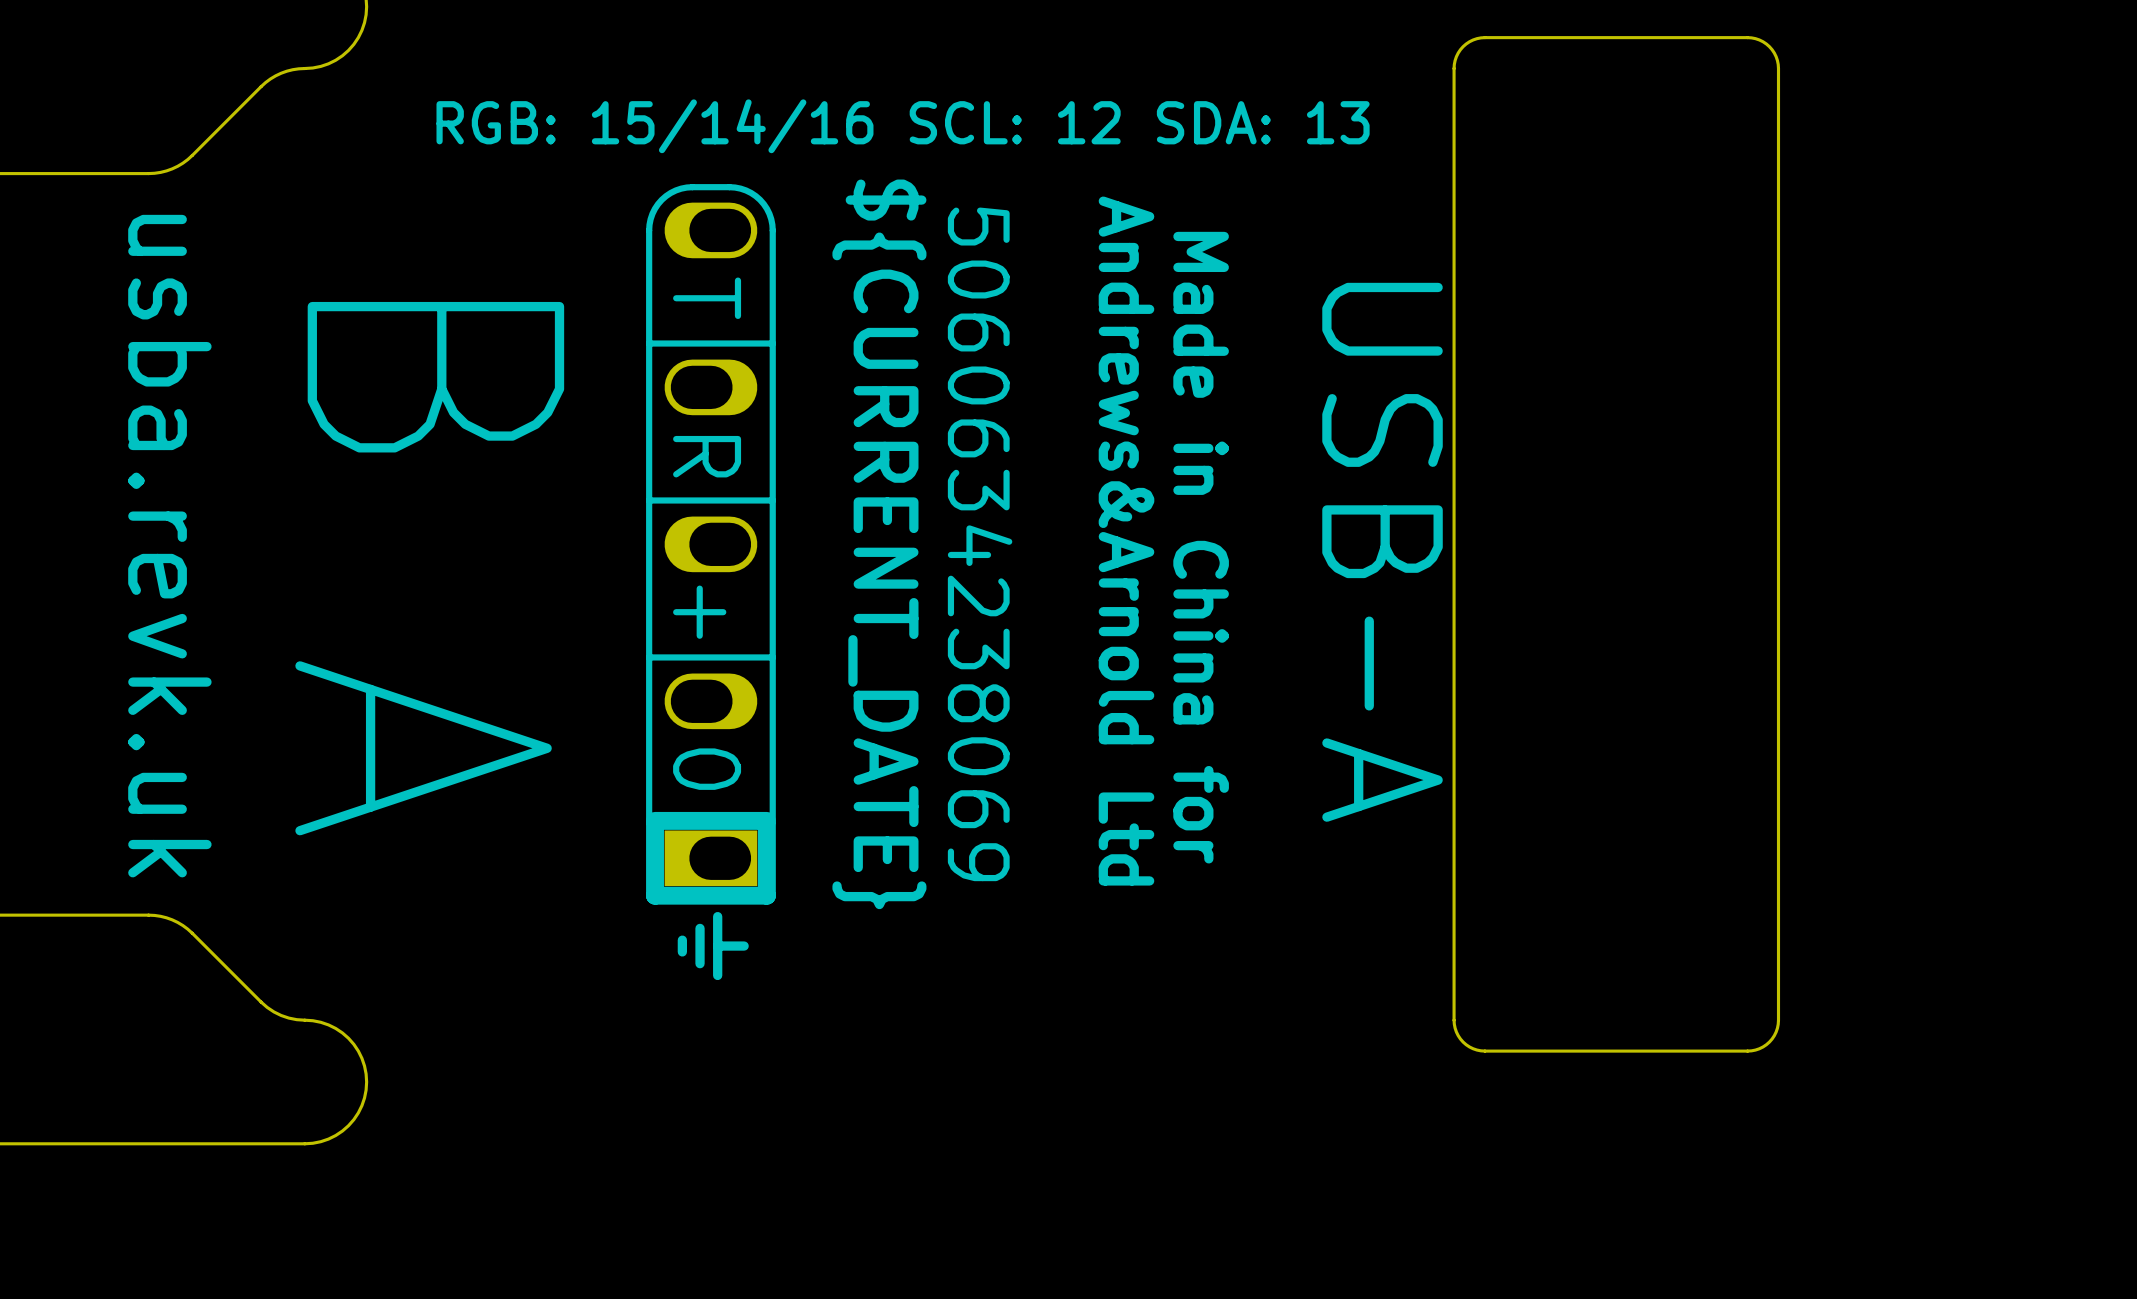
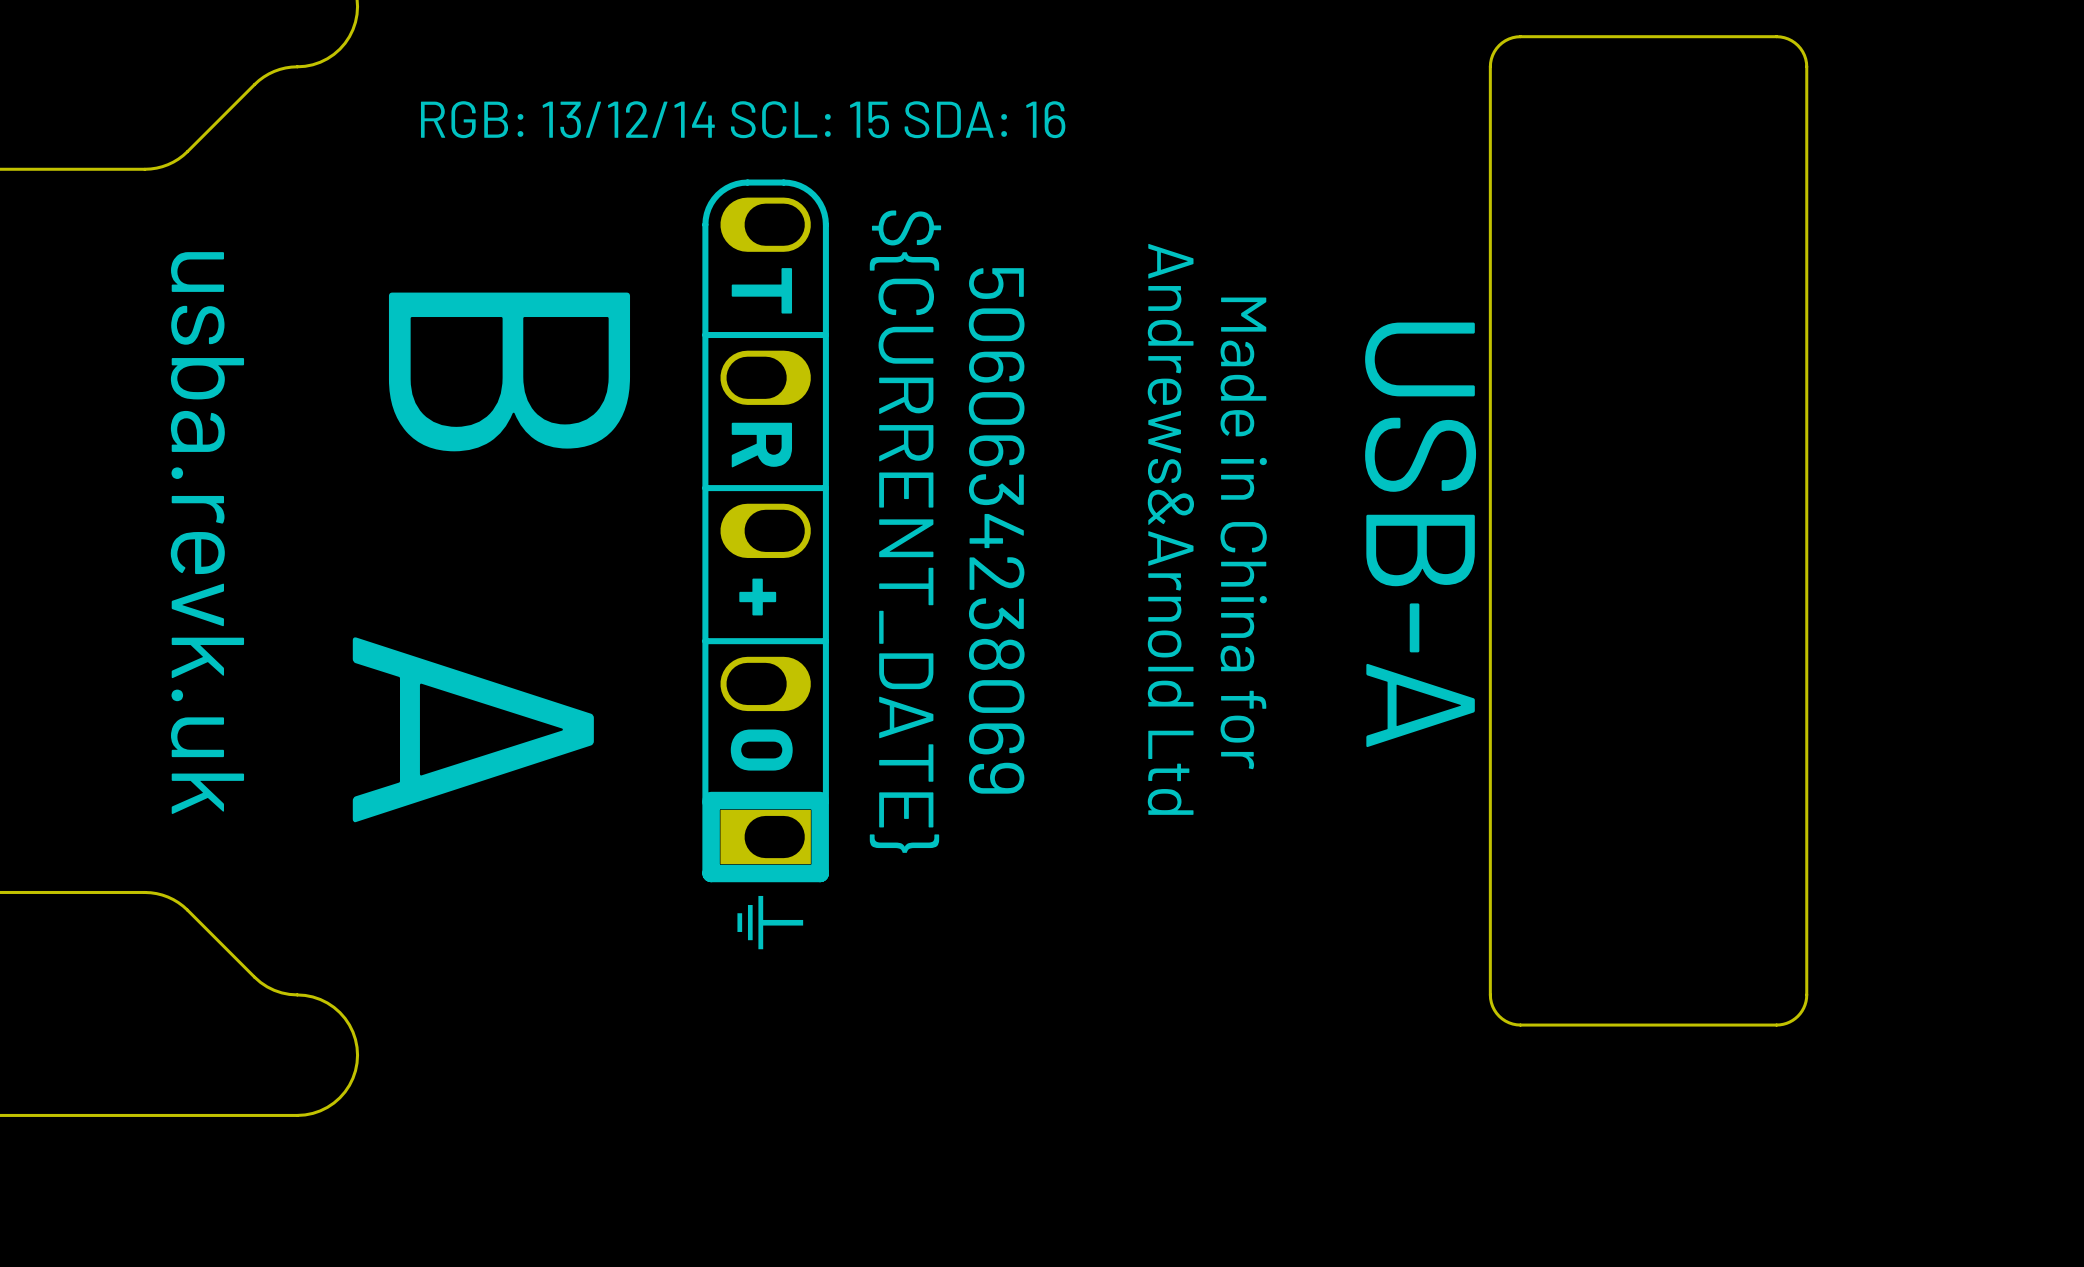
board edge: (1559, 37) (1476, 38) (1466, 44) (1460, 49) (1455, 60) (1454, 68) (1454, 1024) (1456, 1032) (1463, 1042) (1476, 1050) (1559, 1051) -> (1520, 36) (1508, 38) (1499, 45) (1492, 55) (1490, 66) (1490, 994) (1492, 1006) (1499, 1016) (1508, 1022) (1520, 1025)
board edge: (1747, 37) (1759, 39) (1769, 46) (1776, 56) (1778, 68) (1778, 1020) (1776, 1032) (1769, 1042) (1759, 1048) (1747, 1051) -> (1704, 36) (1784, 37) (1794, 42) (1800, 48) (1804, 55) (1806, 66) (1806, 998) (1803, 1007) (1797, 1016) (1783, 1024) (1704, 1025)
text: RGB: 15/14/16 SCL: 12 SDA: 13 (903, 126) -> RGB: 13/12/14 SCL: 15 SDA: 16 (743, 119)
text position: B (435, 377) -> B (509, 371)
text: Andrews&Arnold Ltd (1126, 541) -> none
part position: (710, 544) -> (765, 530)
text position: ${CURRENT_DATE} (879, 544) -> ${CURRENT_DATE} (905, 531)
text position: 5060634238069 (980, 544) -> 5060634238069 (996, 530)
text position: usba.revk.uk (169, 546) -> usba.revk.uk (207, 533)
text: Made in China for (1201, 547) -> Andrews&Arnold Ltd (1170, 529)
text: none -> Made in China for (1243, 533)
text position: USB-A (1382, 552) -> USB-A (1420, 534)
text position: A (423, 748) -> A (473, 729)

